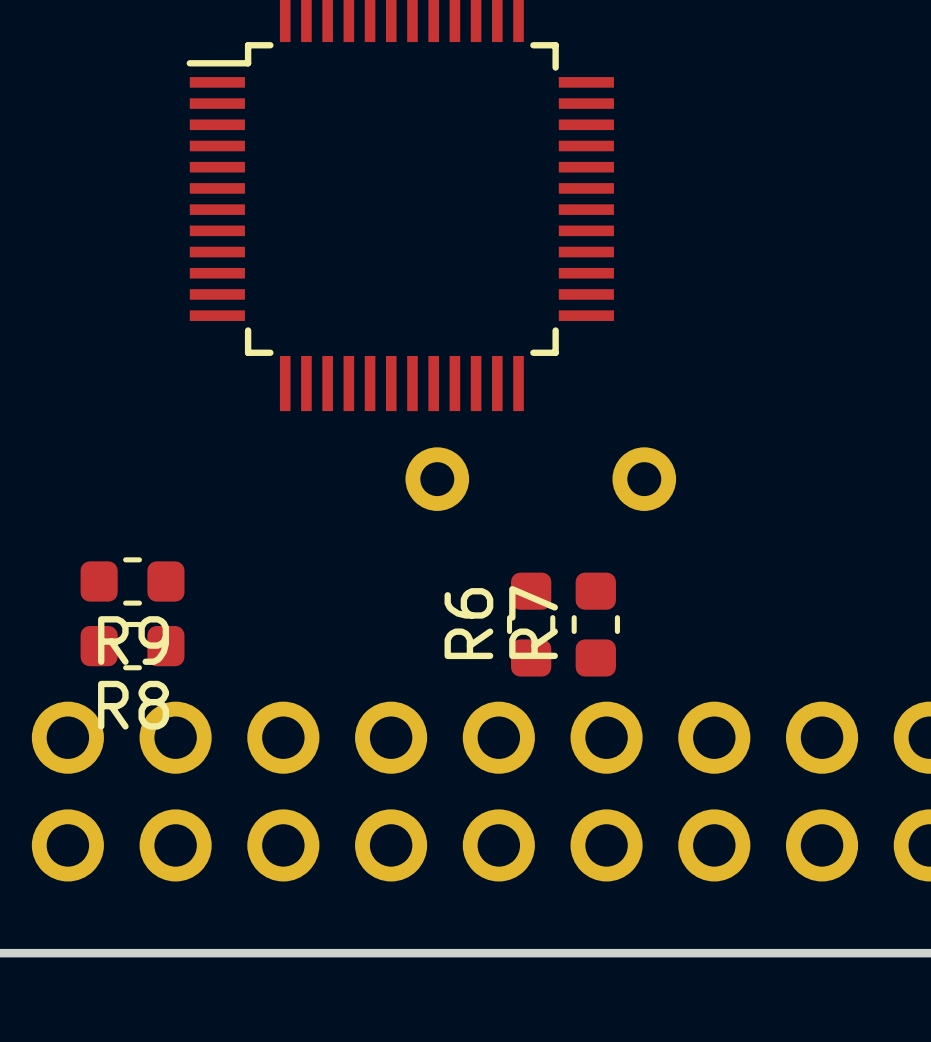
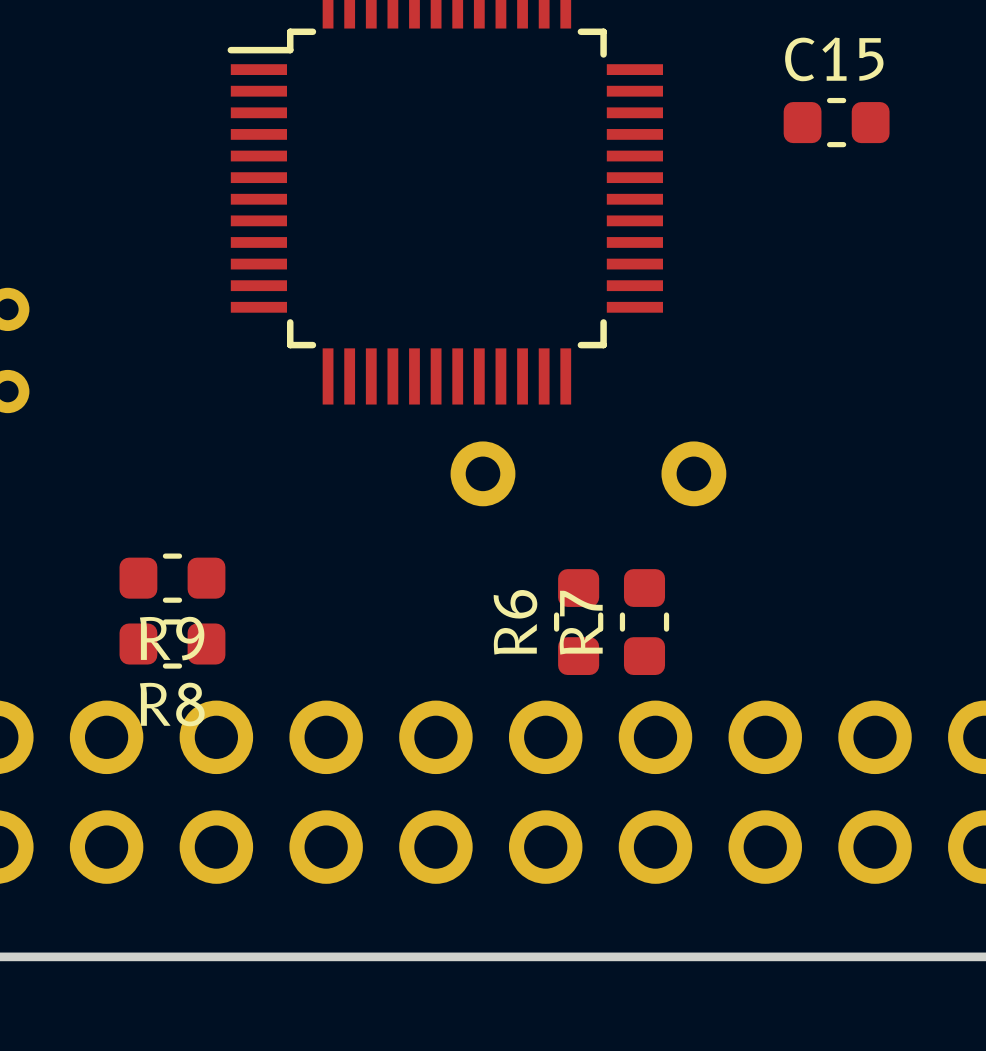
C15: none -> (836, 122)

